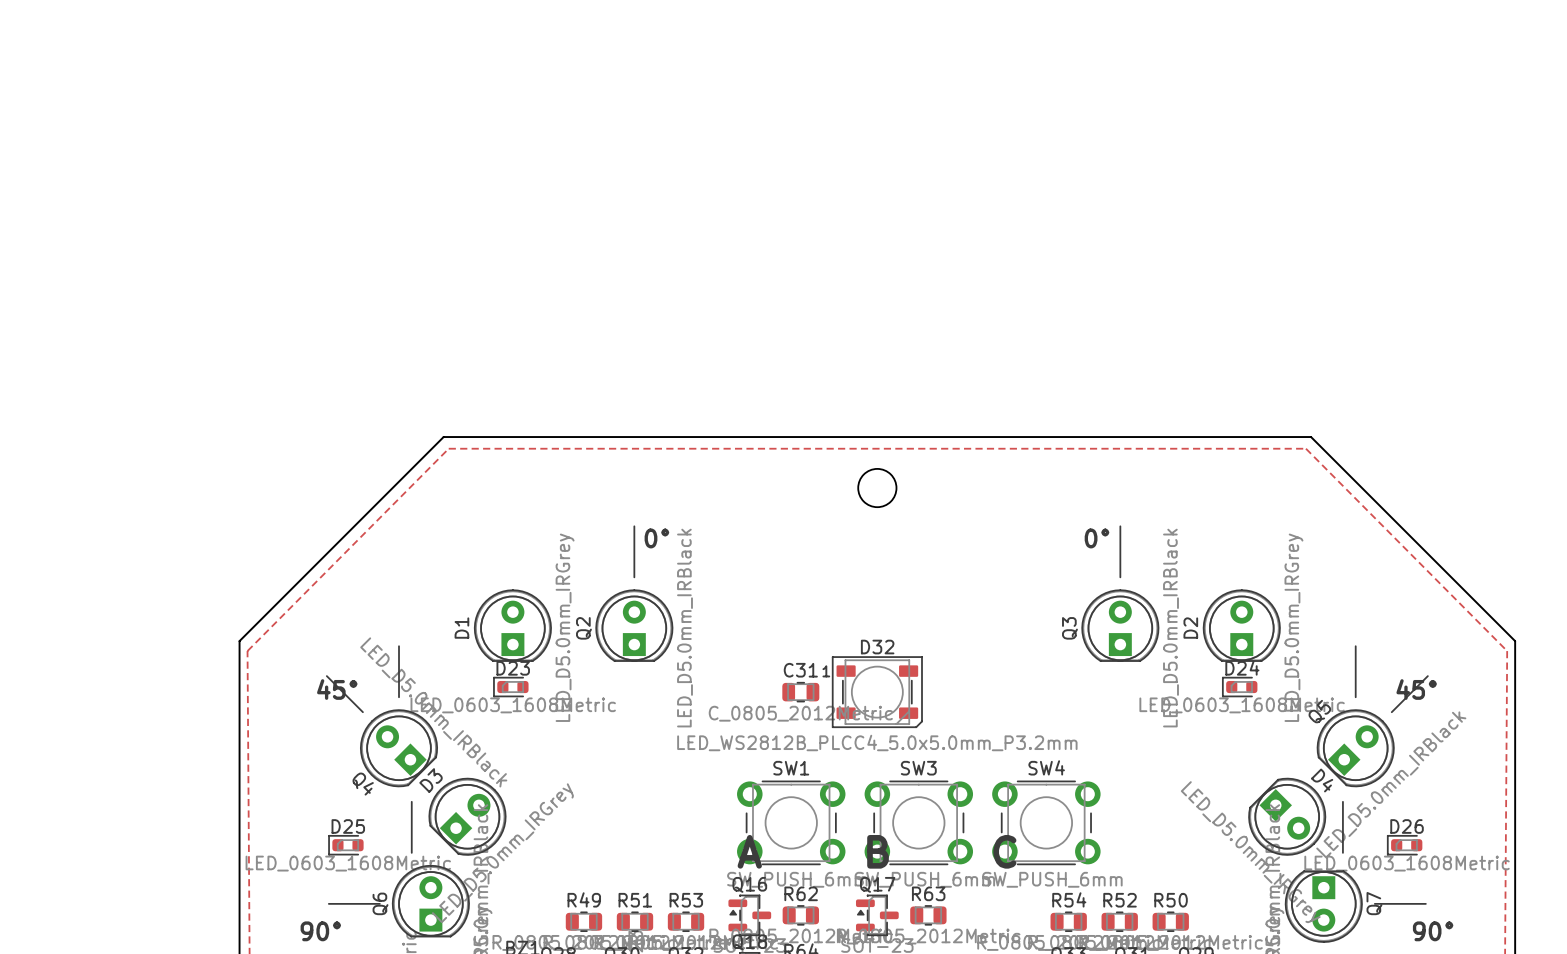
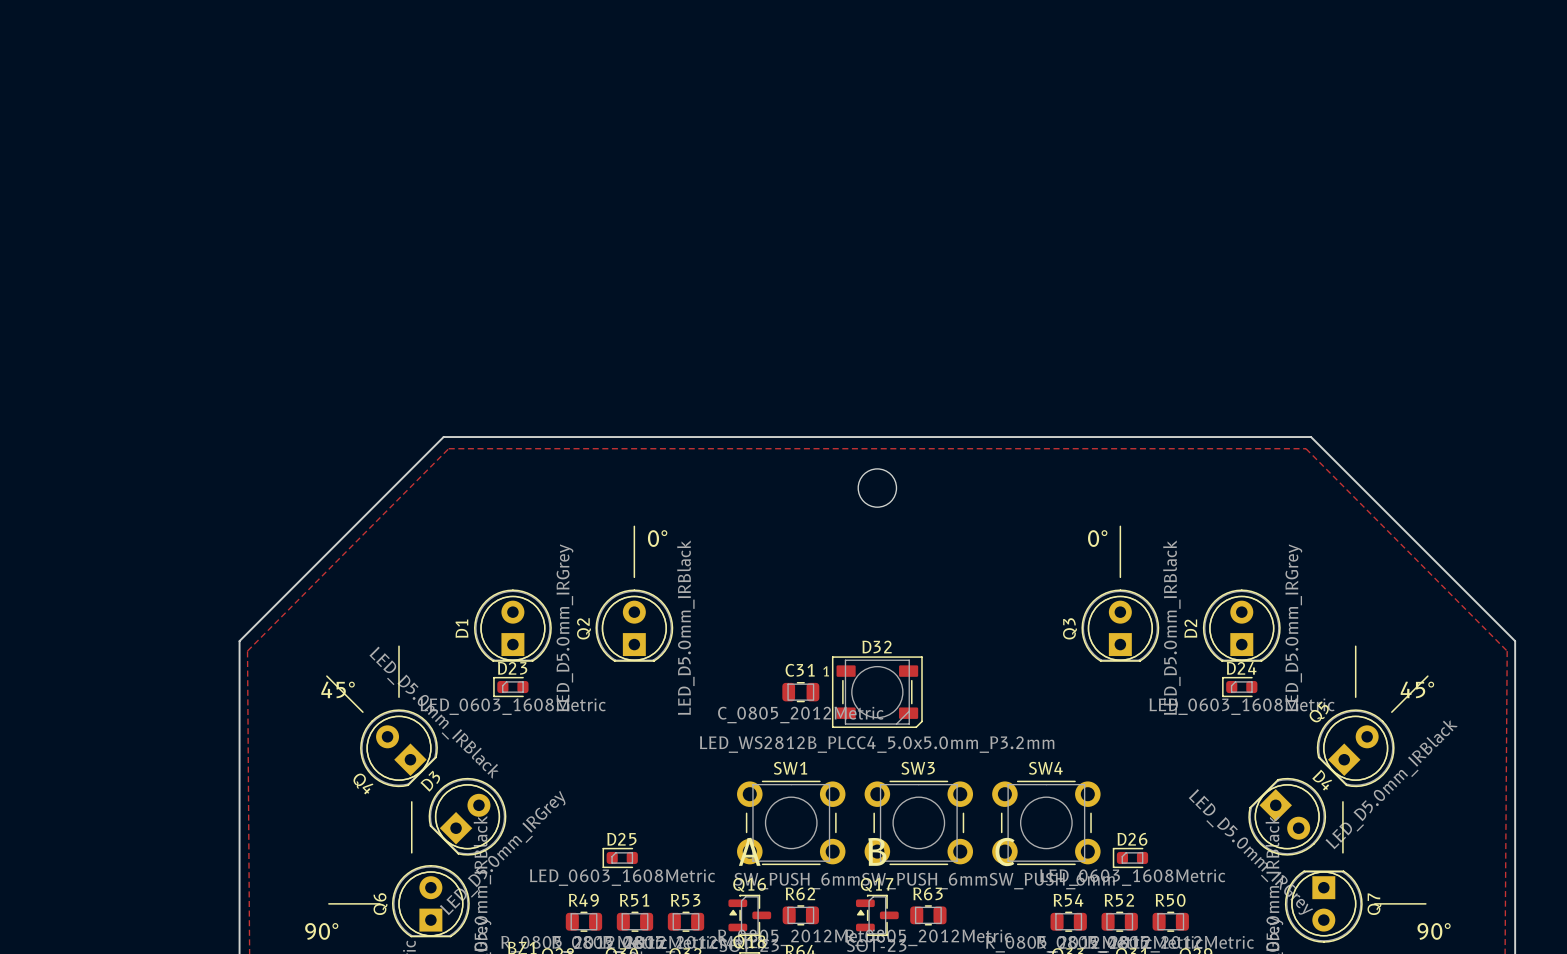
D25 position: (345, 845) -> (620, 857)
D26 position: (1404, 845) -> (1130, 857)

